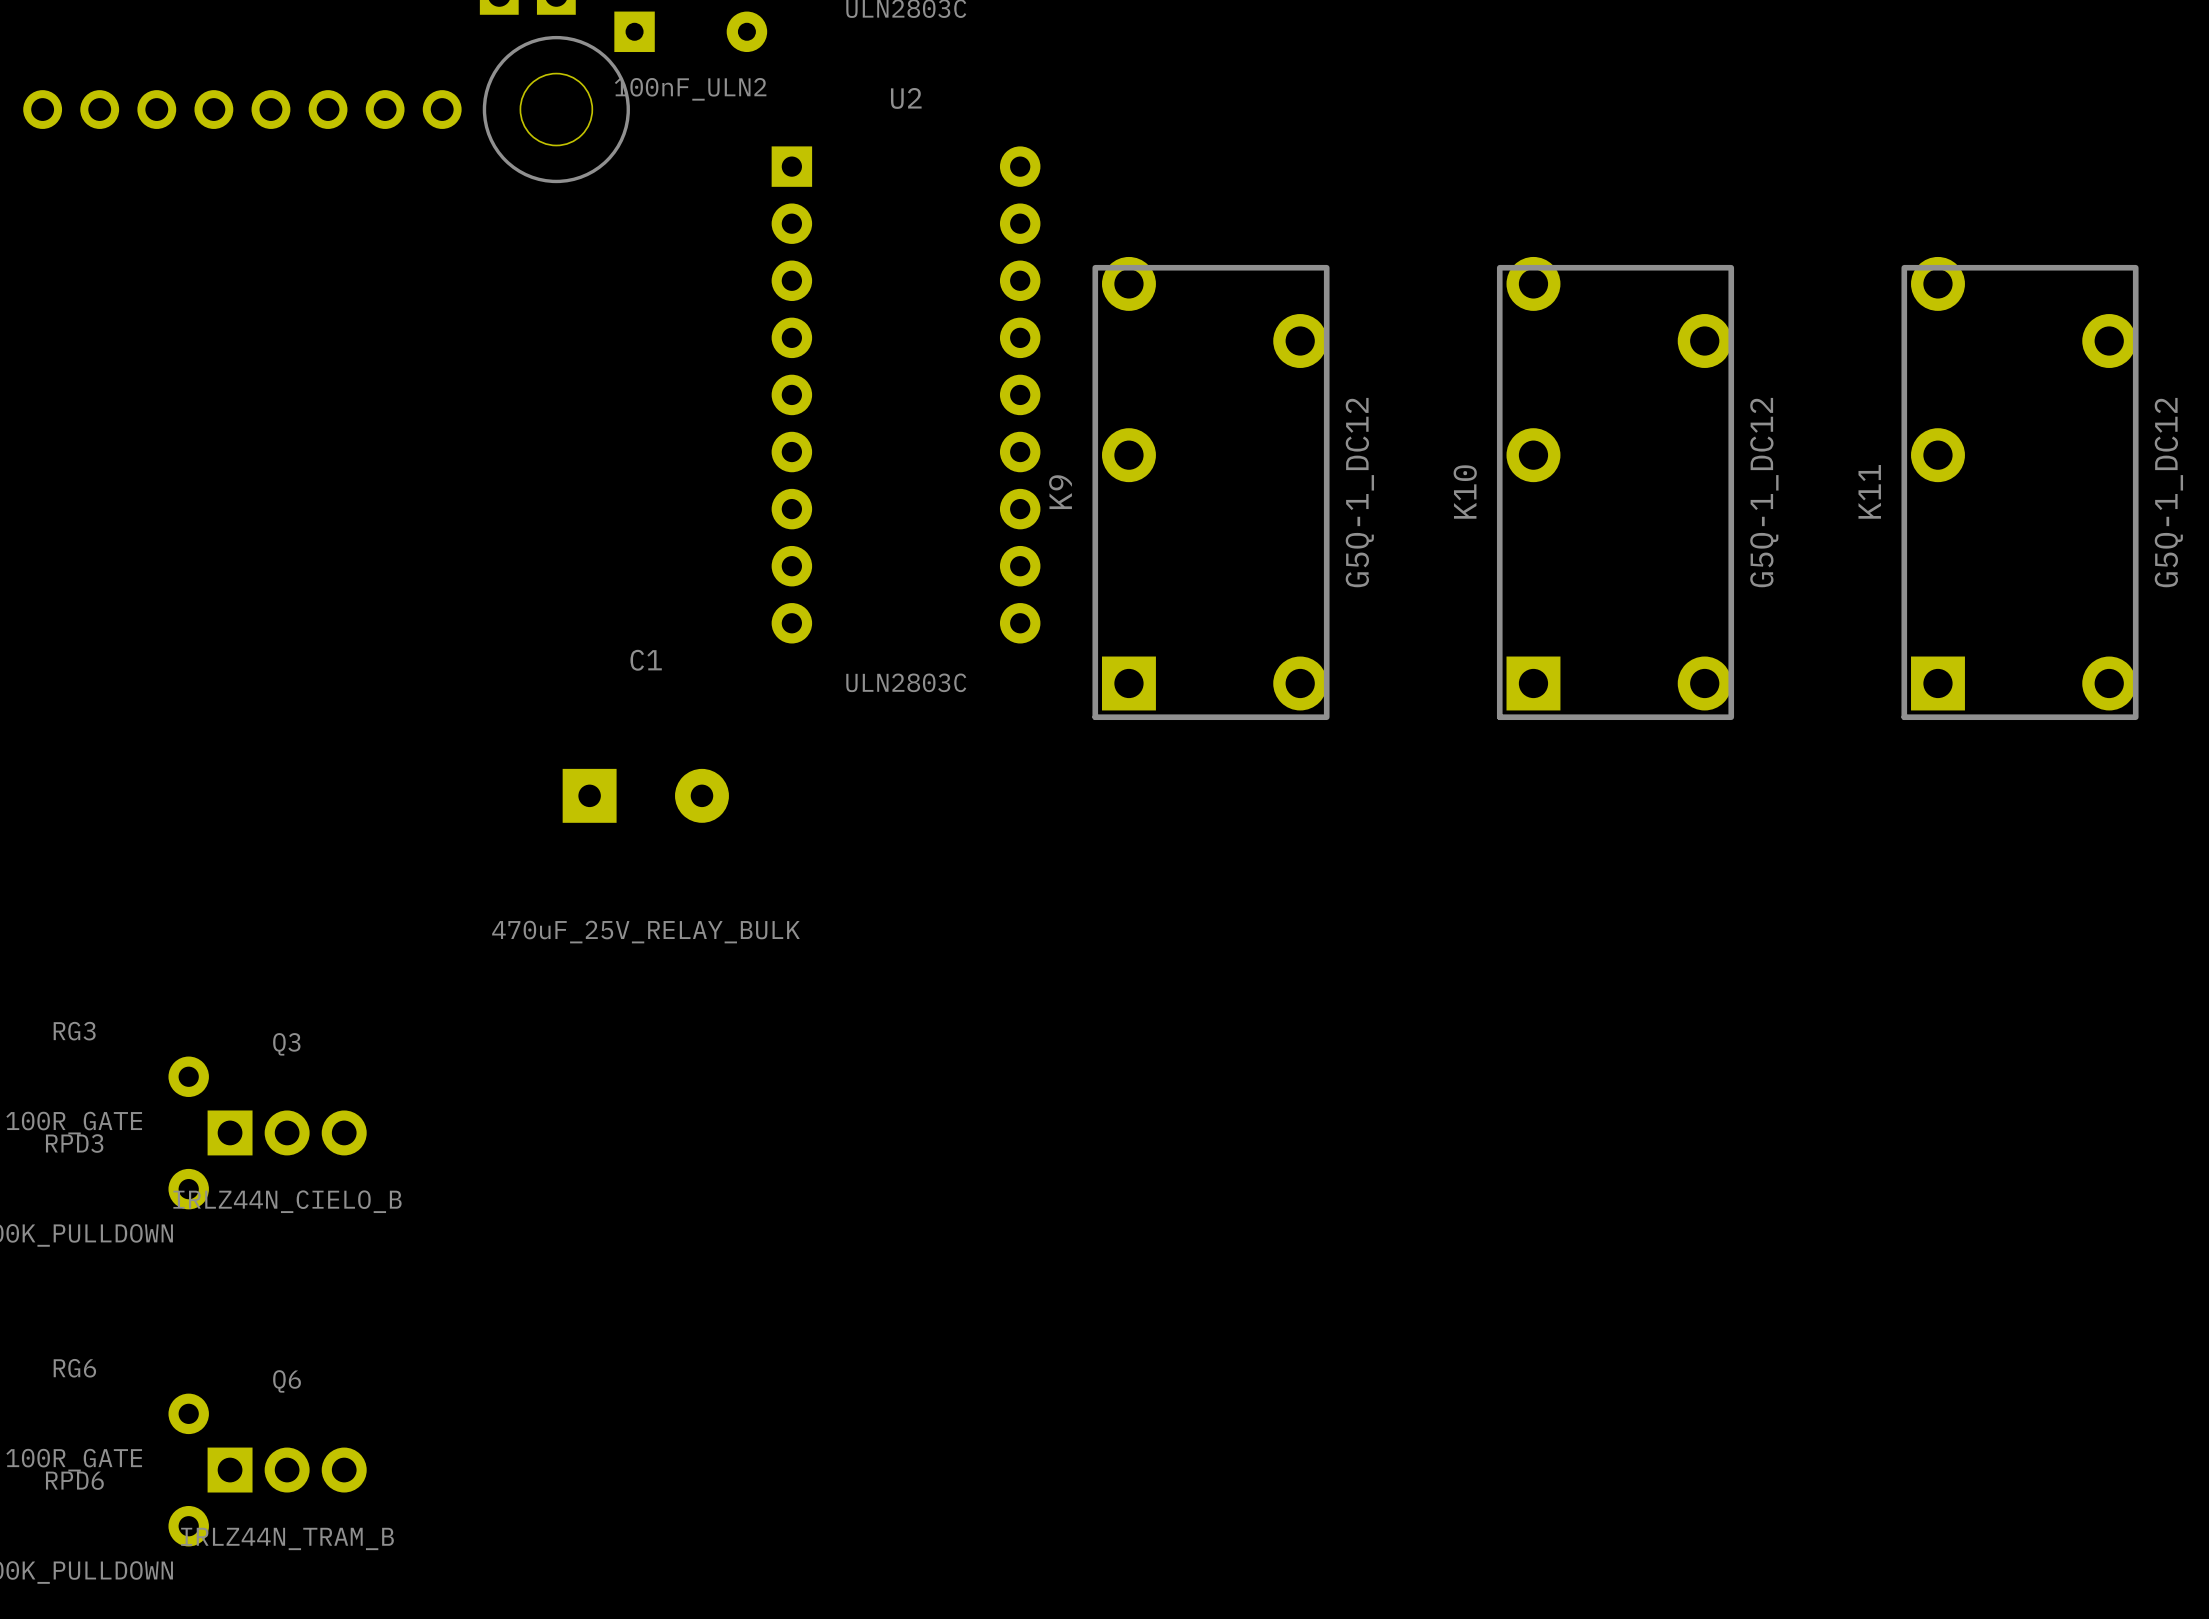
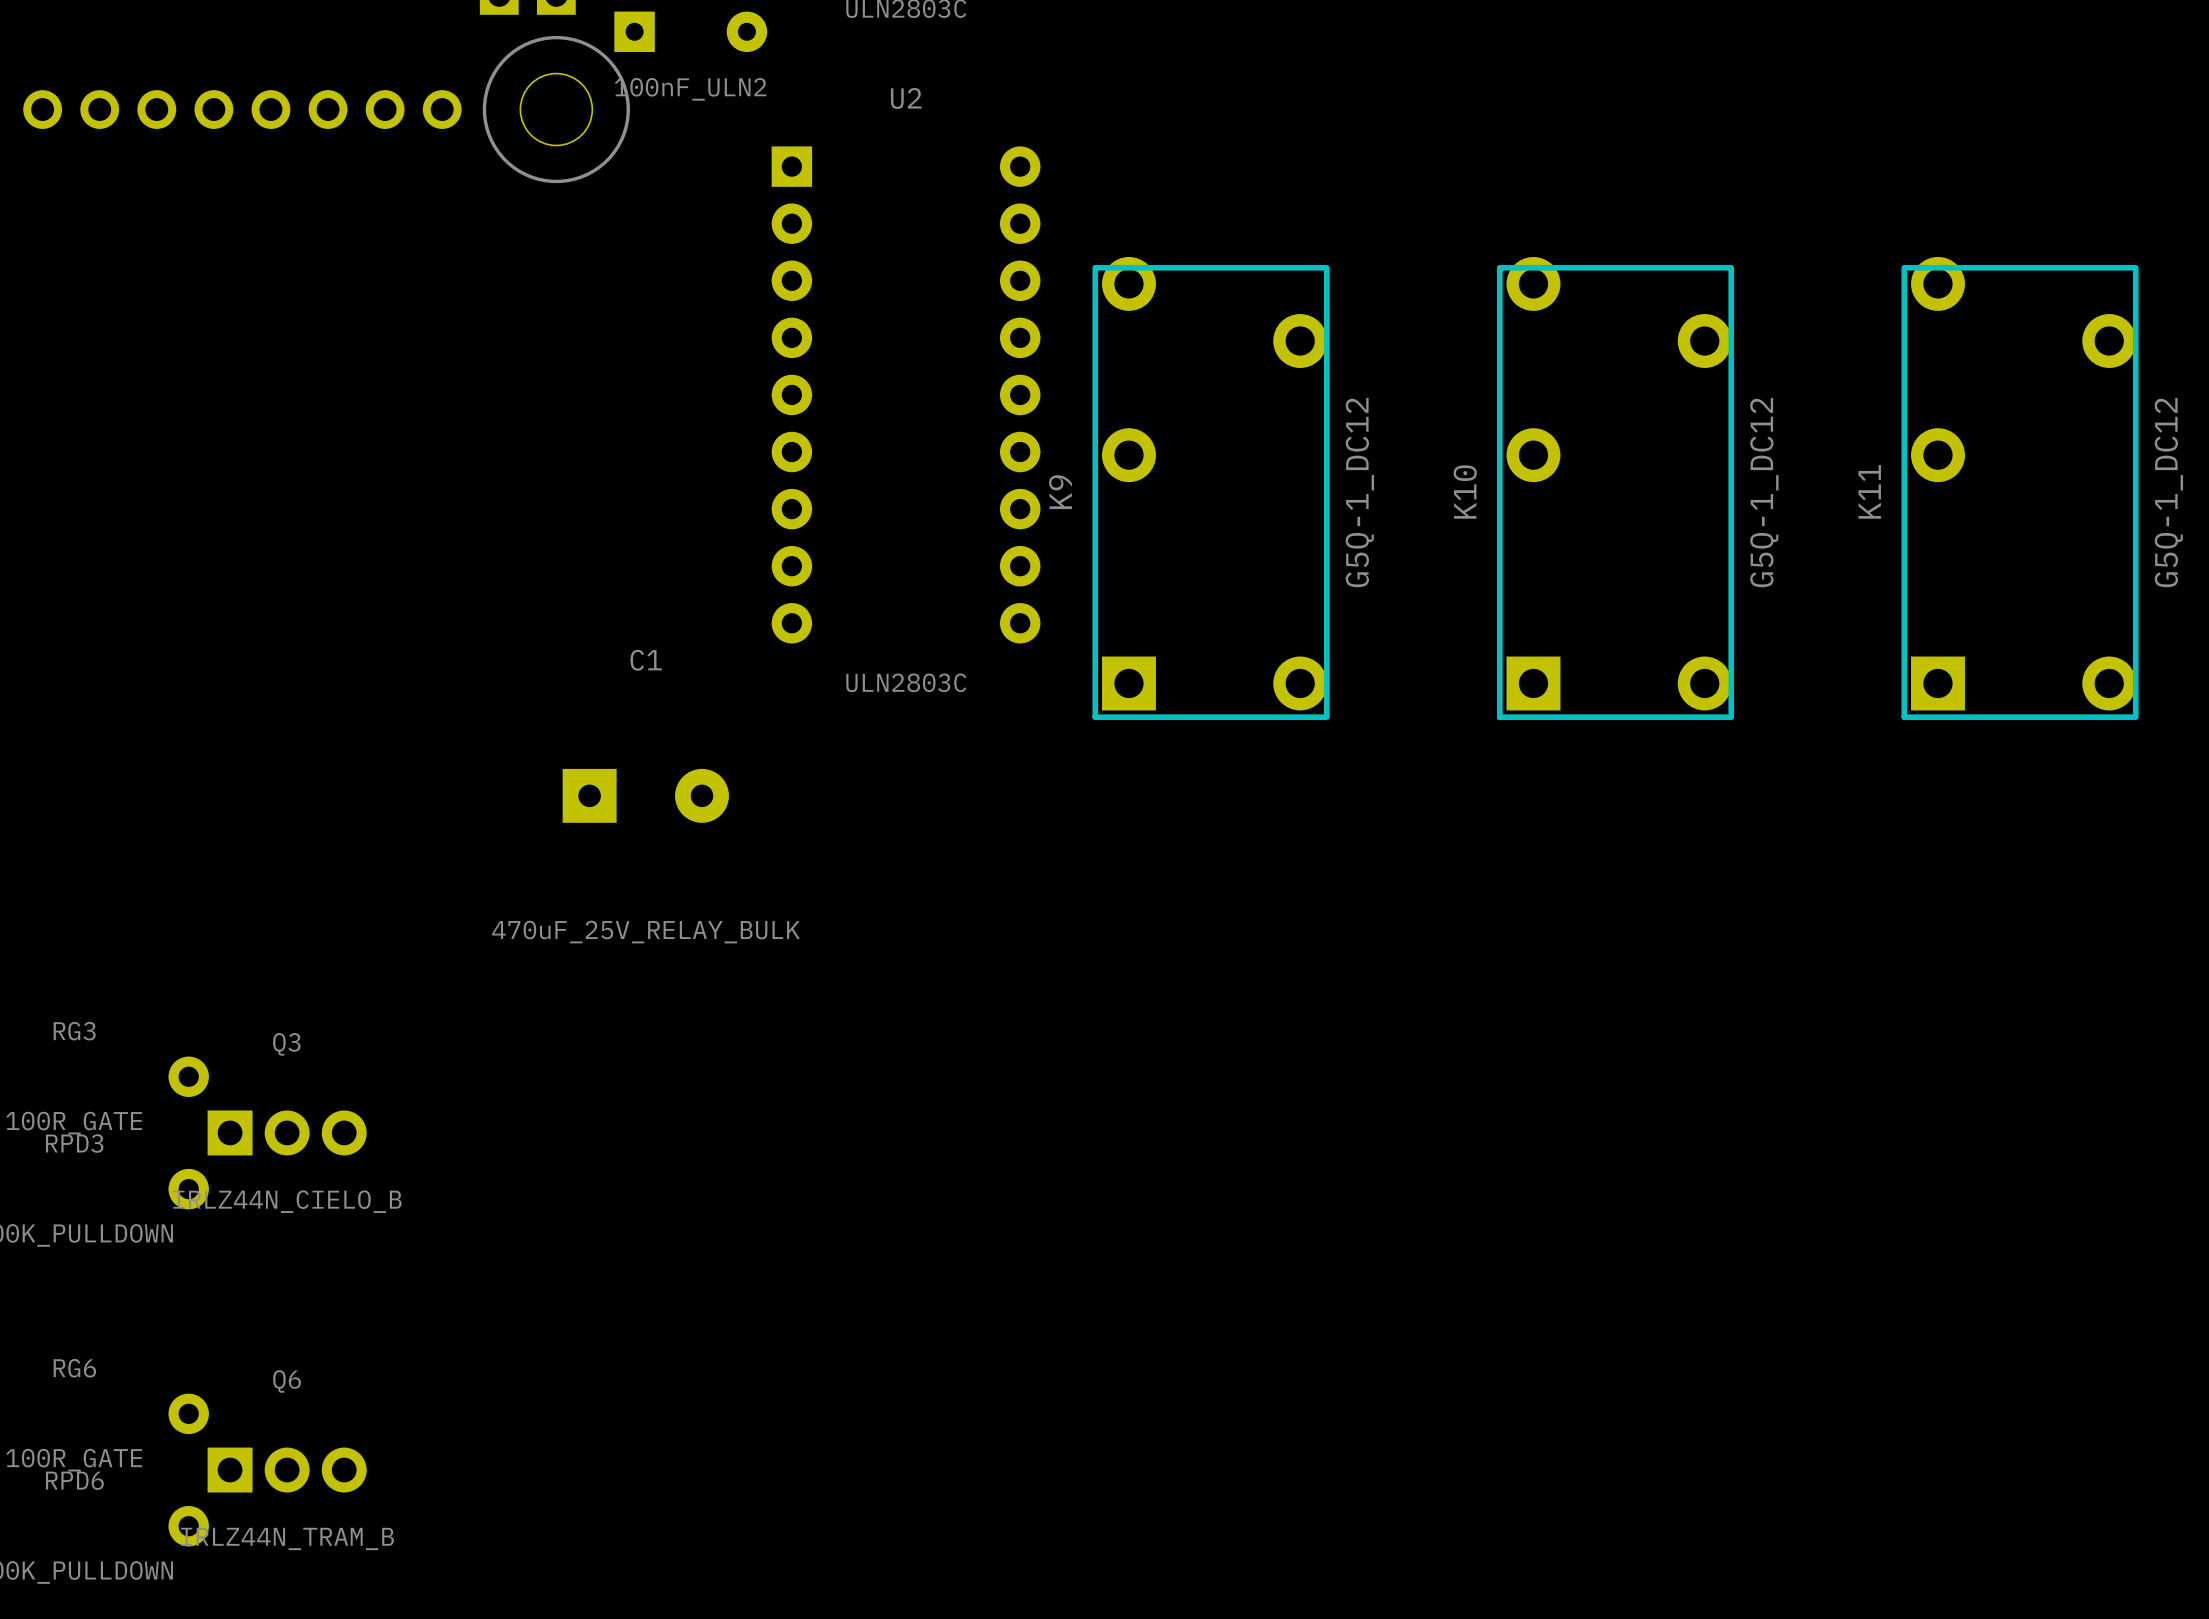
K9 footprint: [1092, 256, 1330, 721] -> [1092, 256, 1330, 721]
K10 footprint: [1496, 256, 1735, 721] -> [1496, 256, 1735, 721]
K11 footprint: [1901, 256, 2139, 721] -> [1901, 256, 2139, 721]

